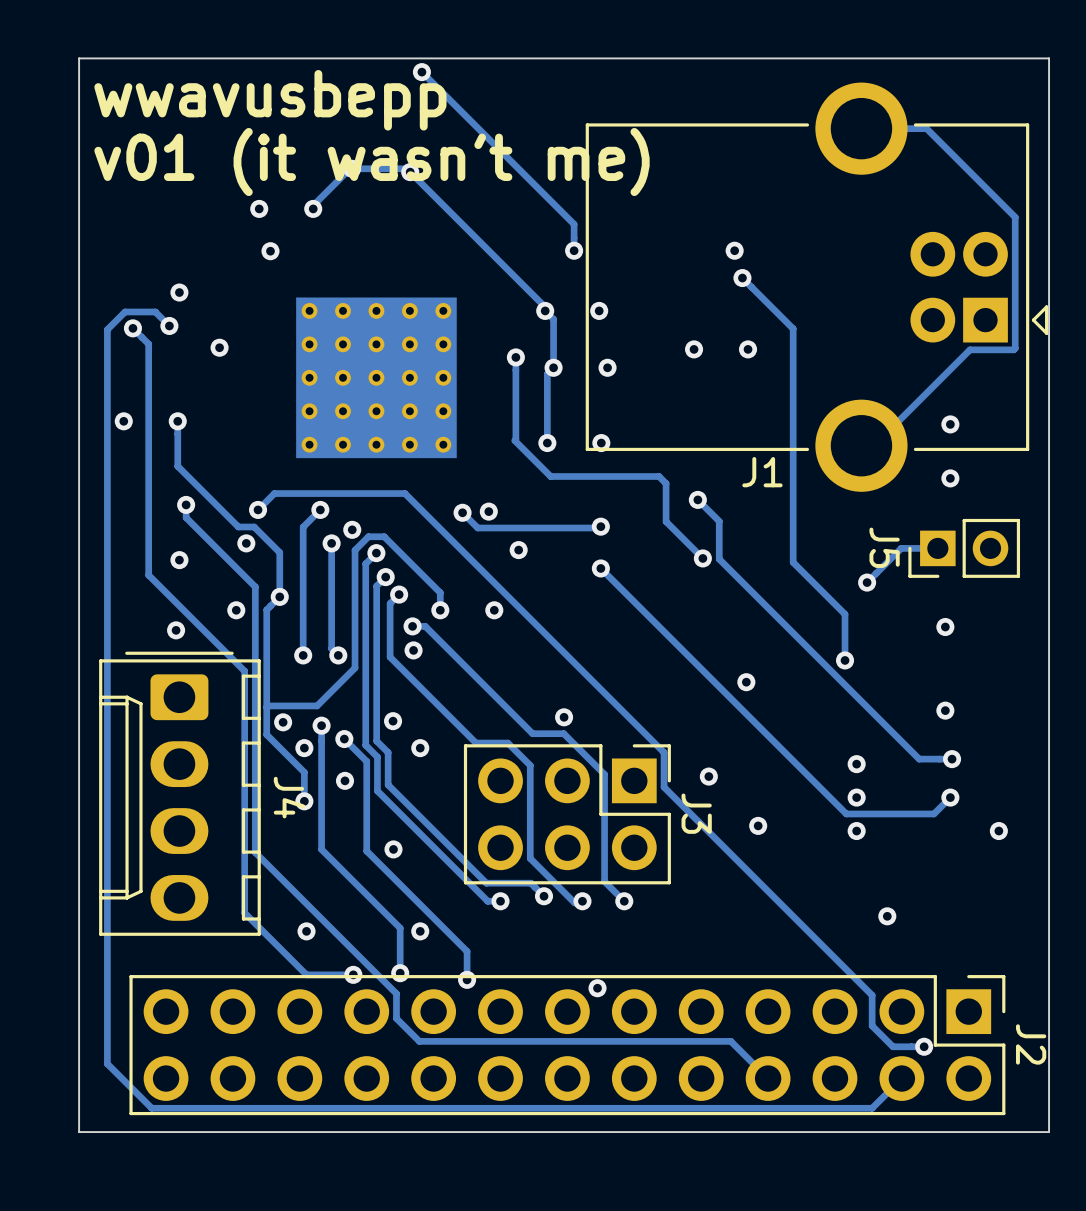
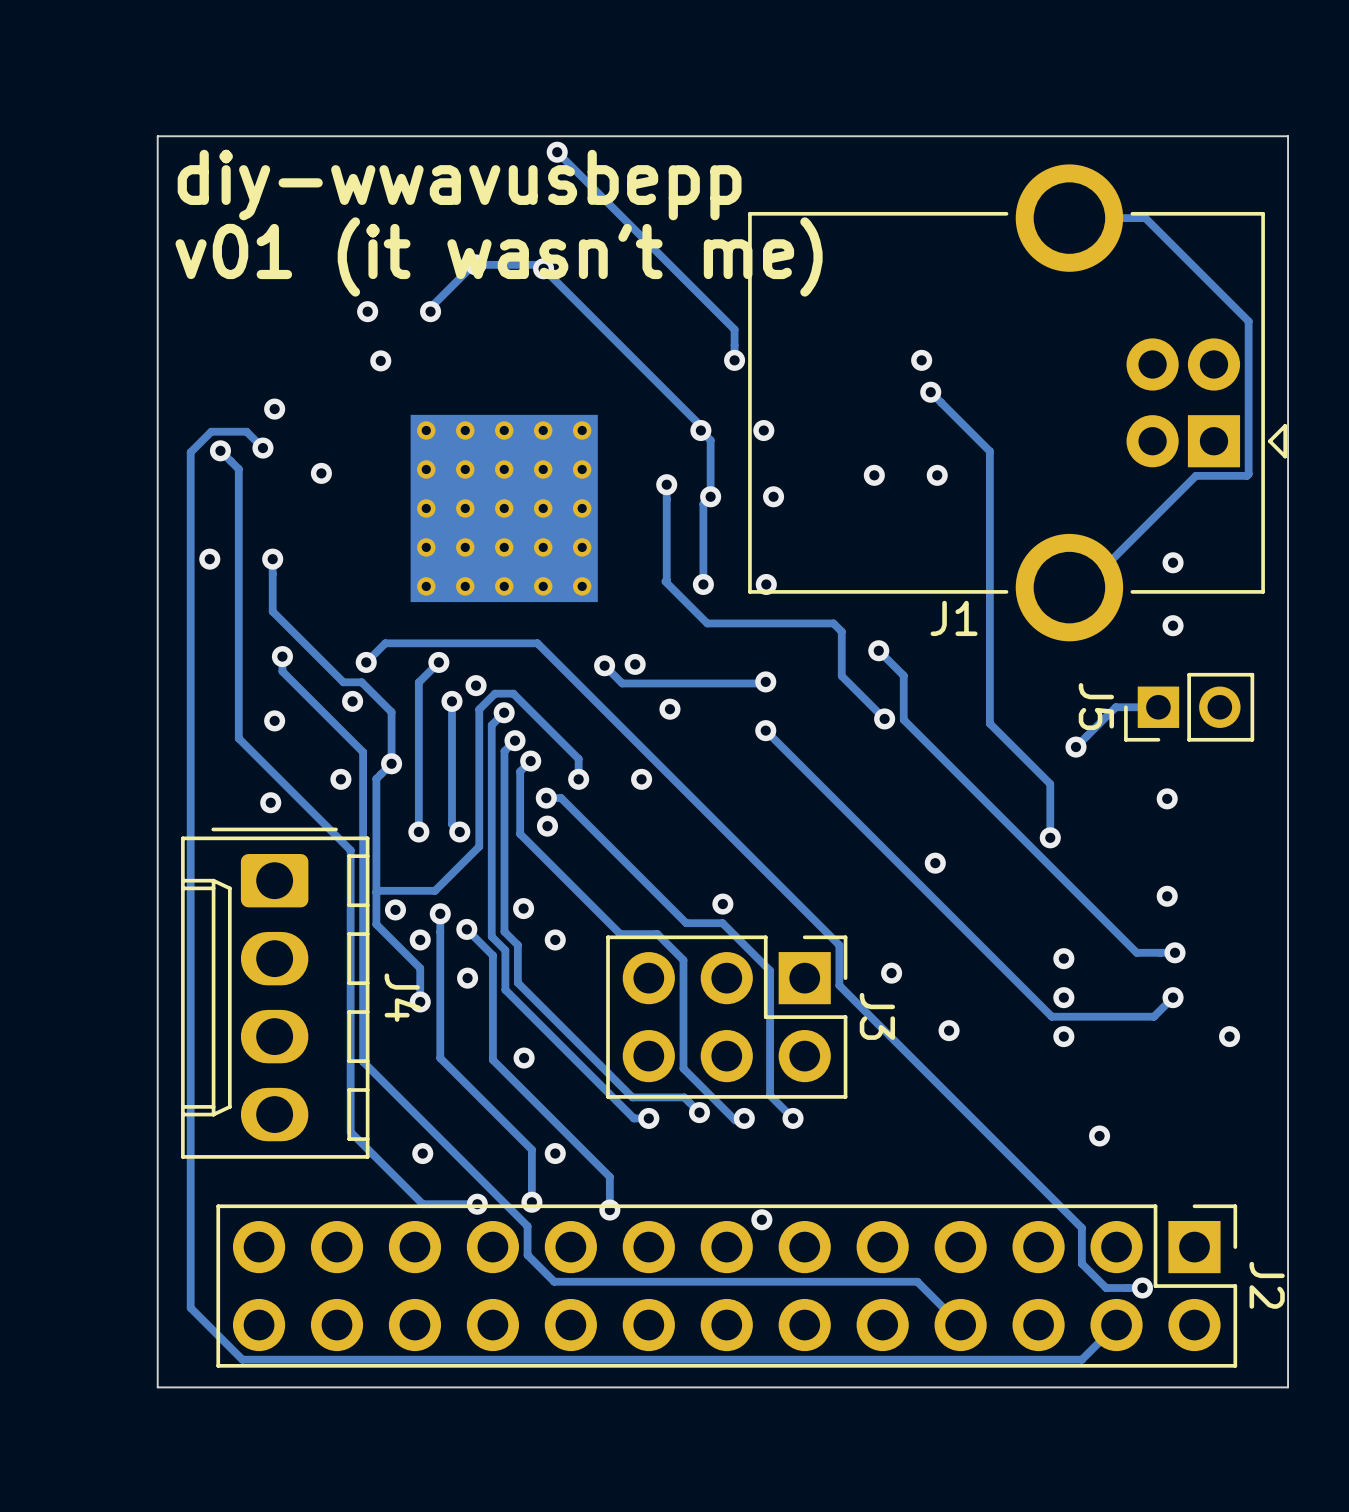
text: wwavusbepp (270, 100) -> diy-wwavusbepp (459, 185)

